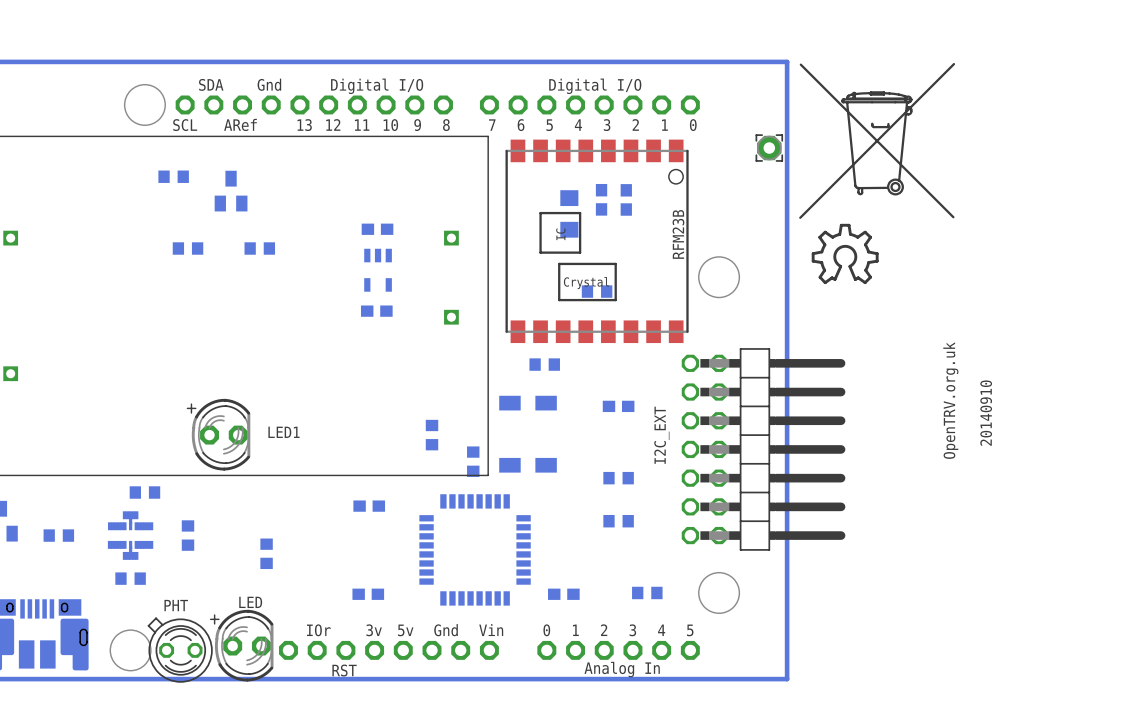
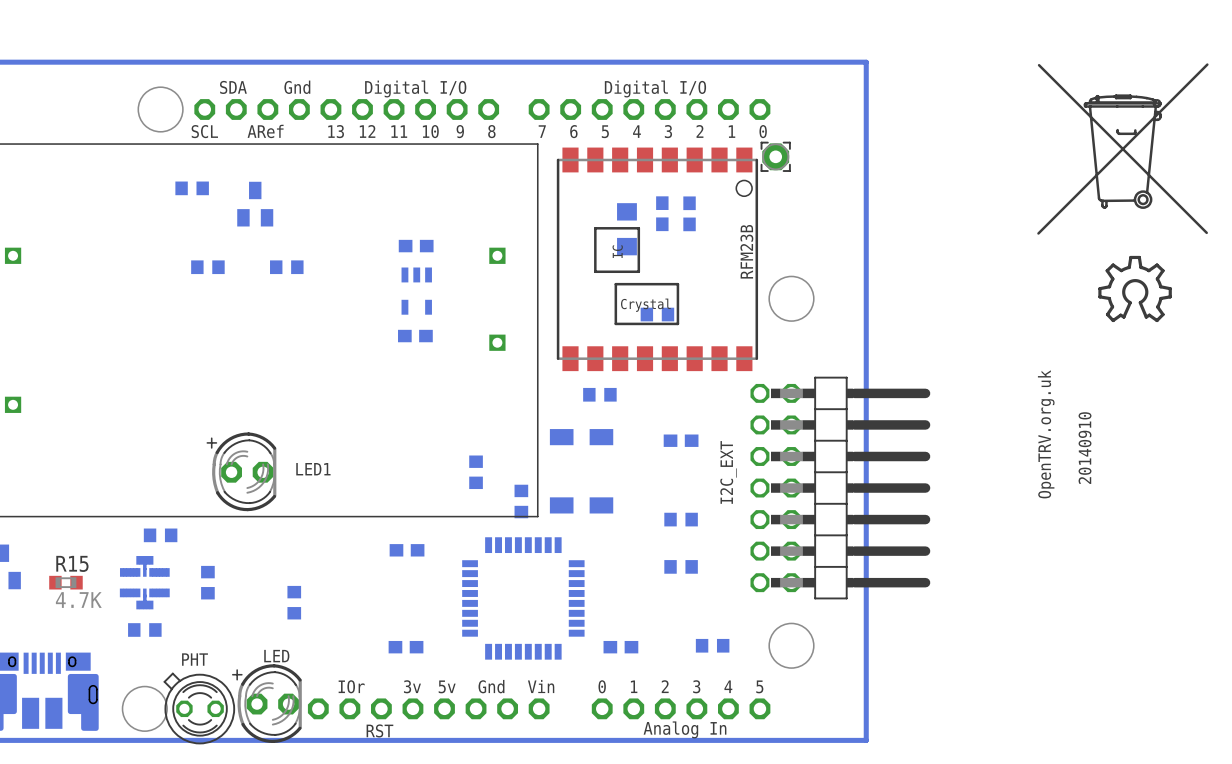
drawing position: (877, 140) -> (1122, 149)
part position: (769, 148) -> (775, 156)
drawing position: (845, 253) -> (1135, 289)
R15 side: bottom (58, 535) -> top (65, 582)

